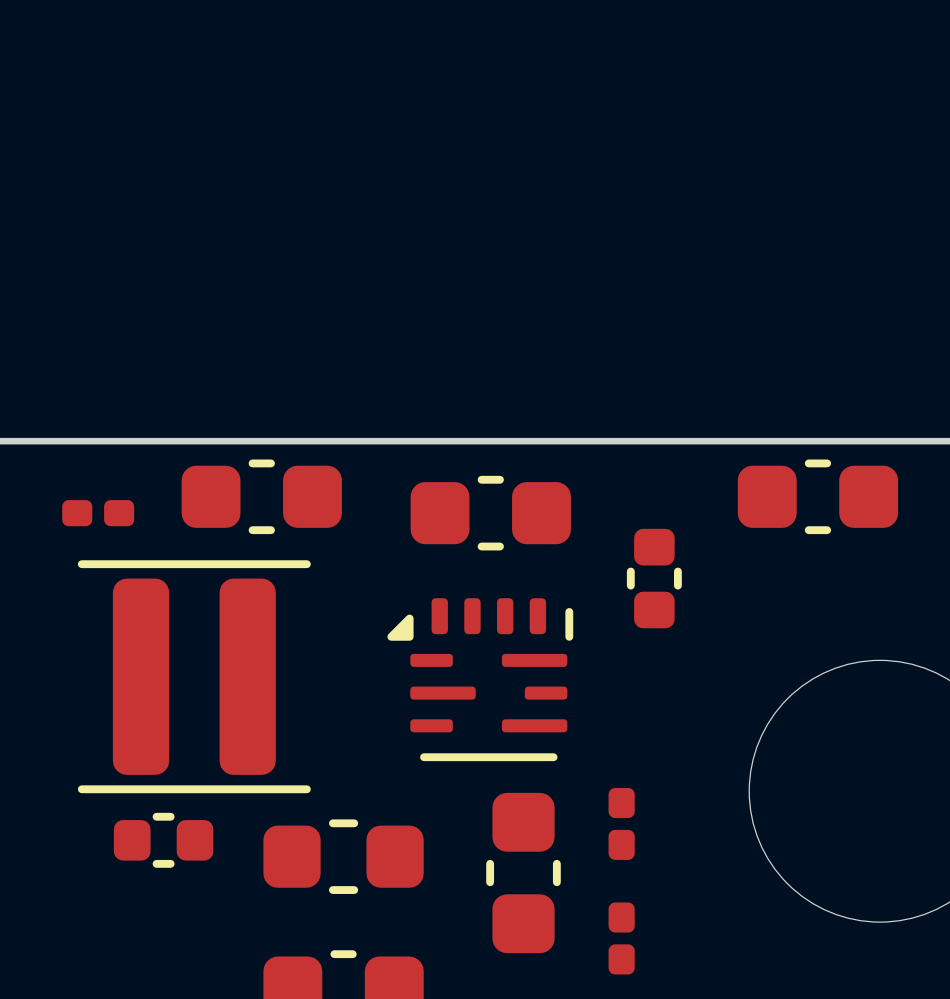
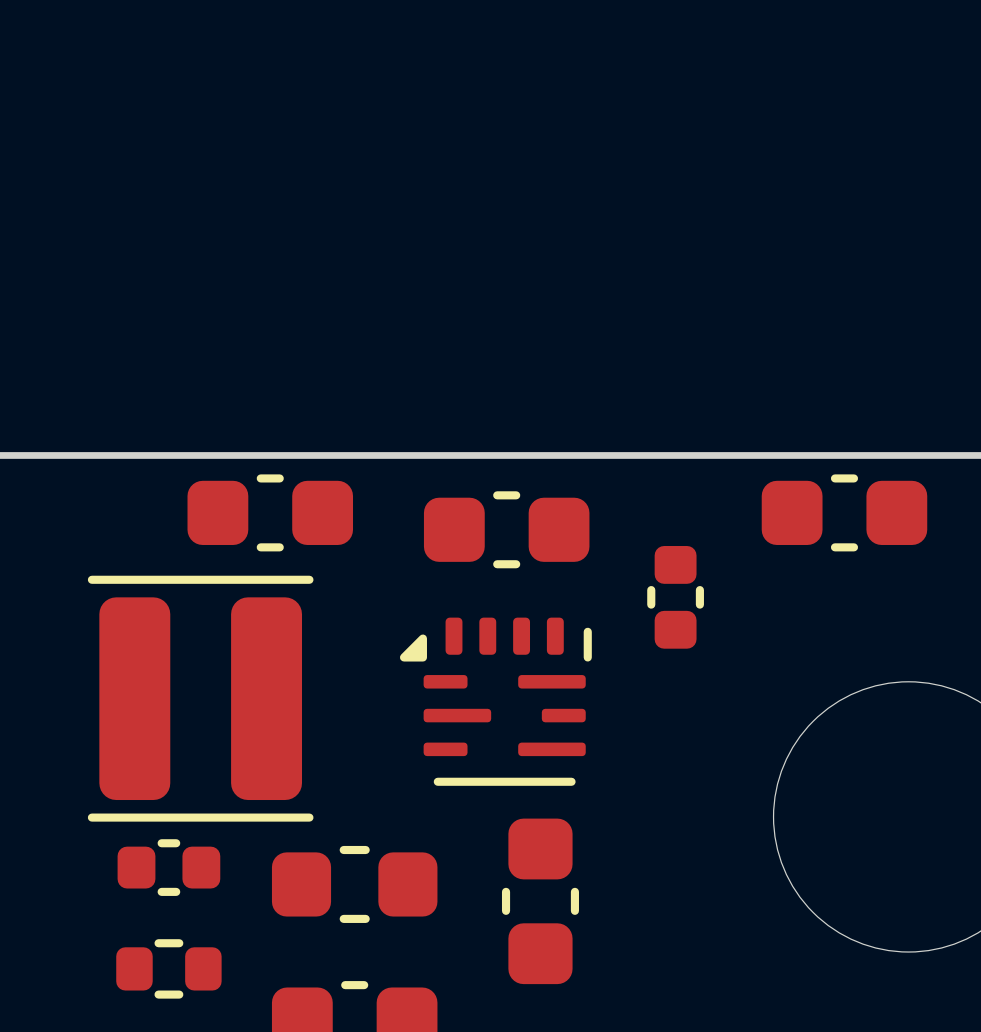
part: (98, 513) -> none
part footprint: [77, 560, 311, 794] -> [87, 575, 314, 822]
part: (621, 823) -> none
part: none -> (168, 968)
part: (621, 938) -> none

